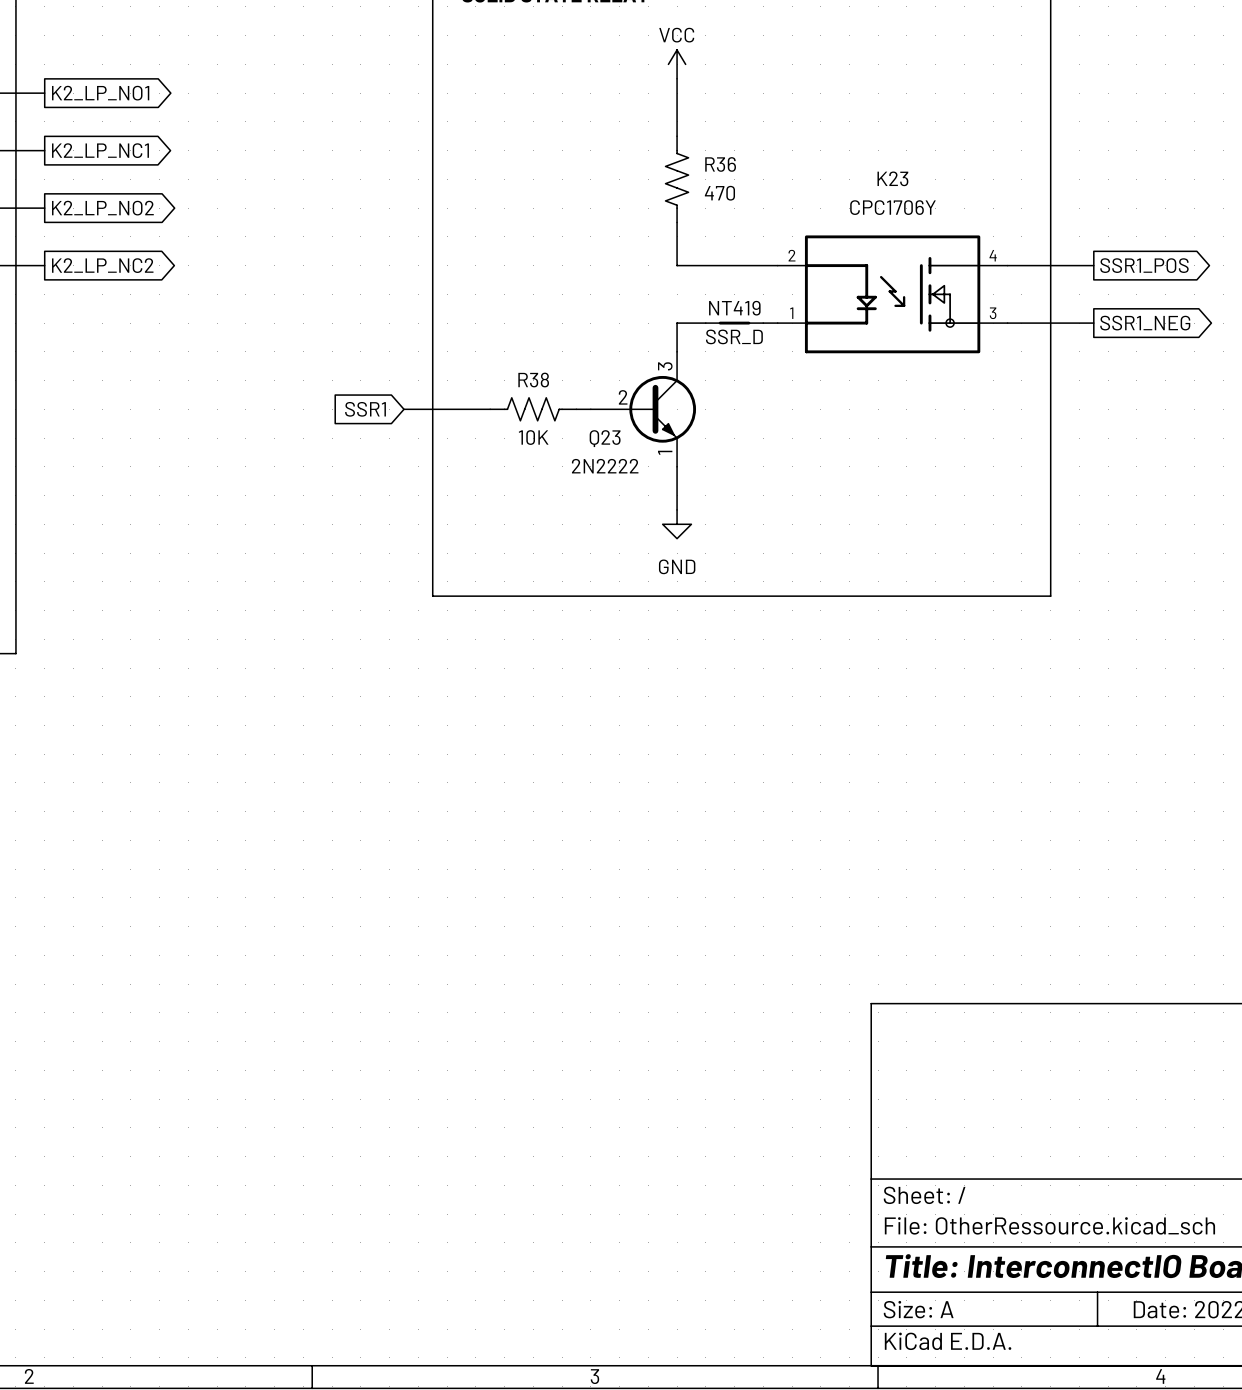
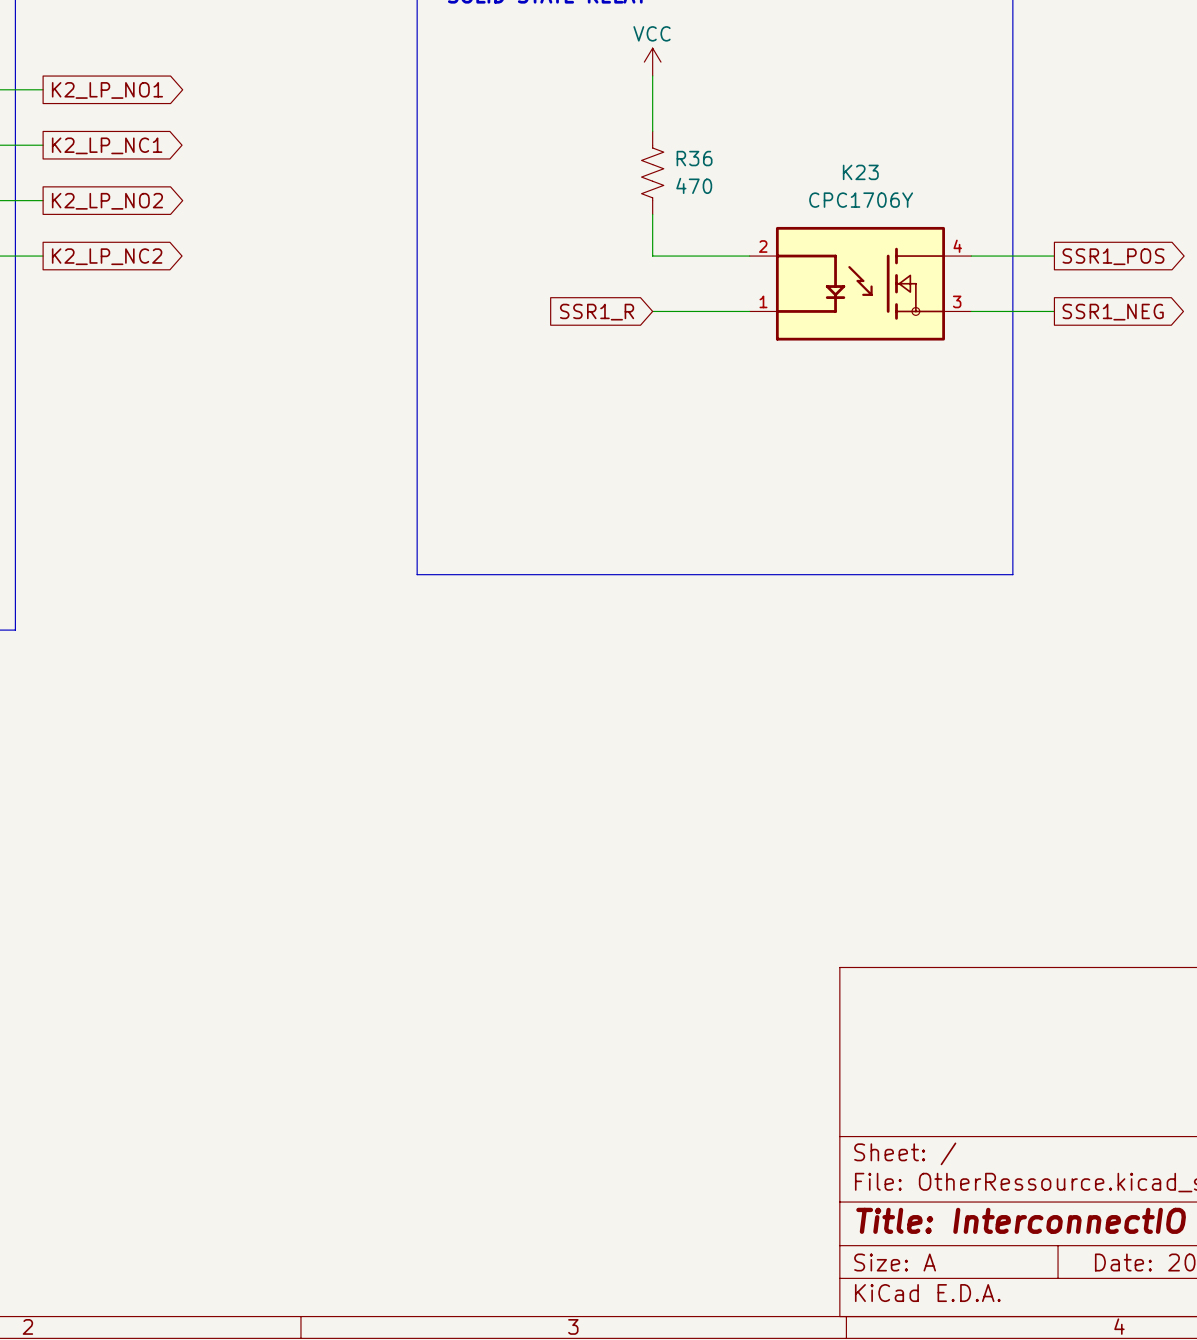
global label: none -> SSR1_R (597, 312)
wire: (677, 323) (677, 351) -> none
NT419: SSR_D (734, 323) -> none
global label: SSR1 (365, 409) -> none
wire: (403, 409) (490, 409) -> none
R38: 10K (533, 409) -> none
wire: (576, 409) (590, 409) -> none
Q23: 2N2222 (643, 409) -> none
wire: (677, 466) (677, 509) -> none
power symbol: GND (677, 524) -> none

